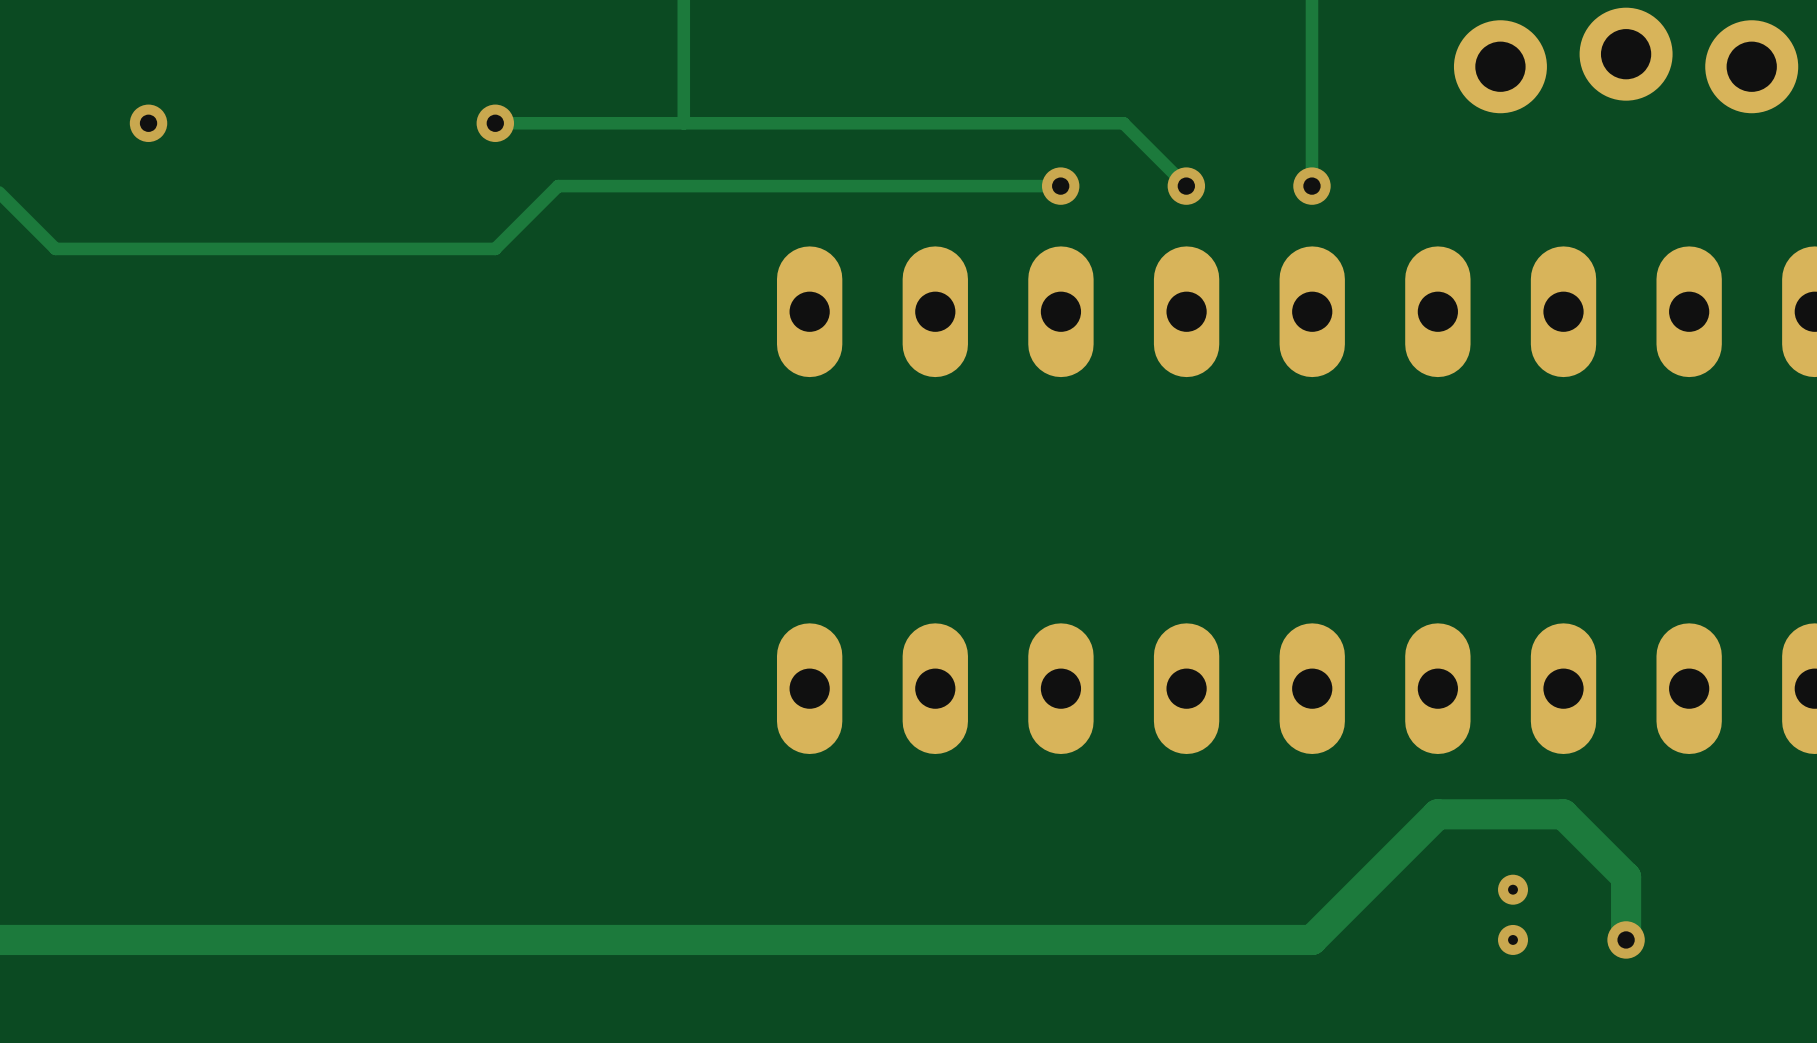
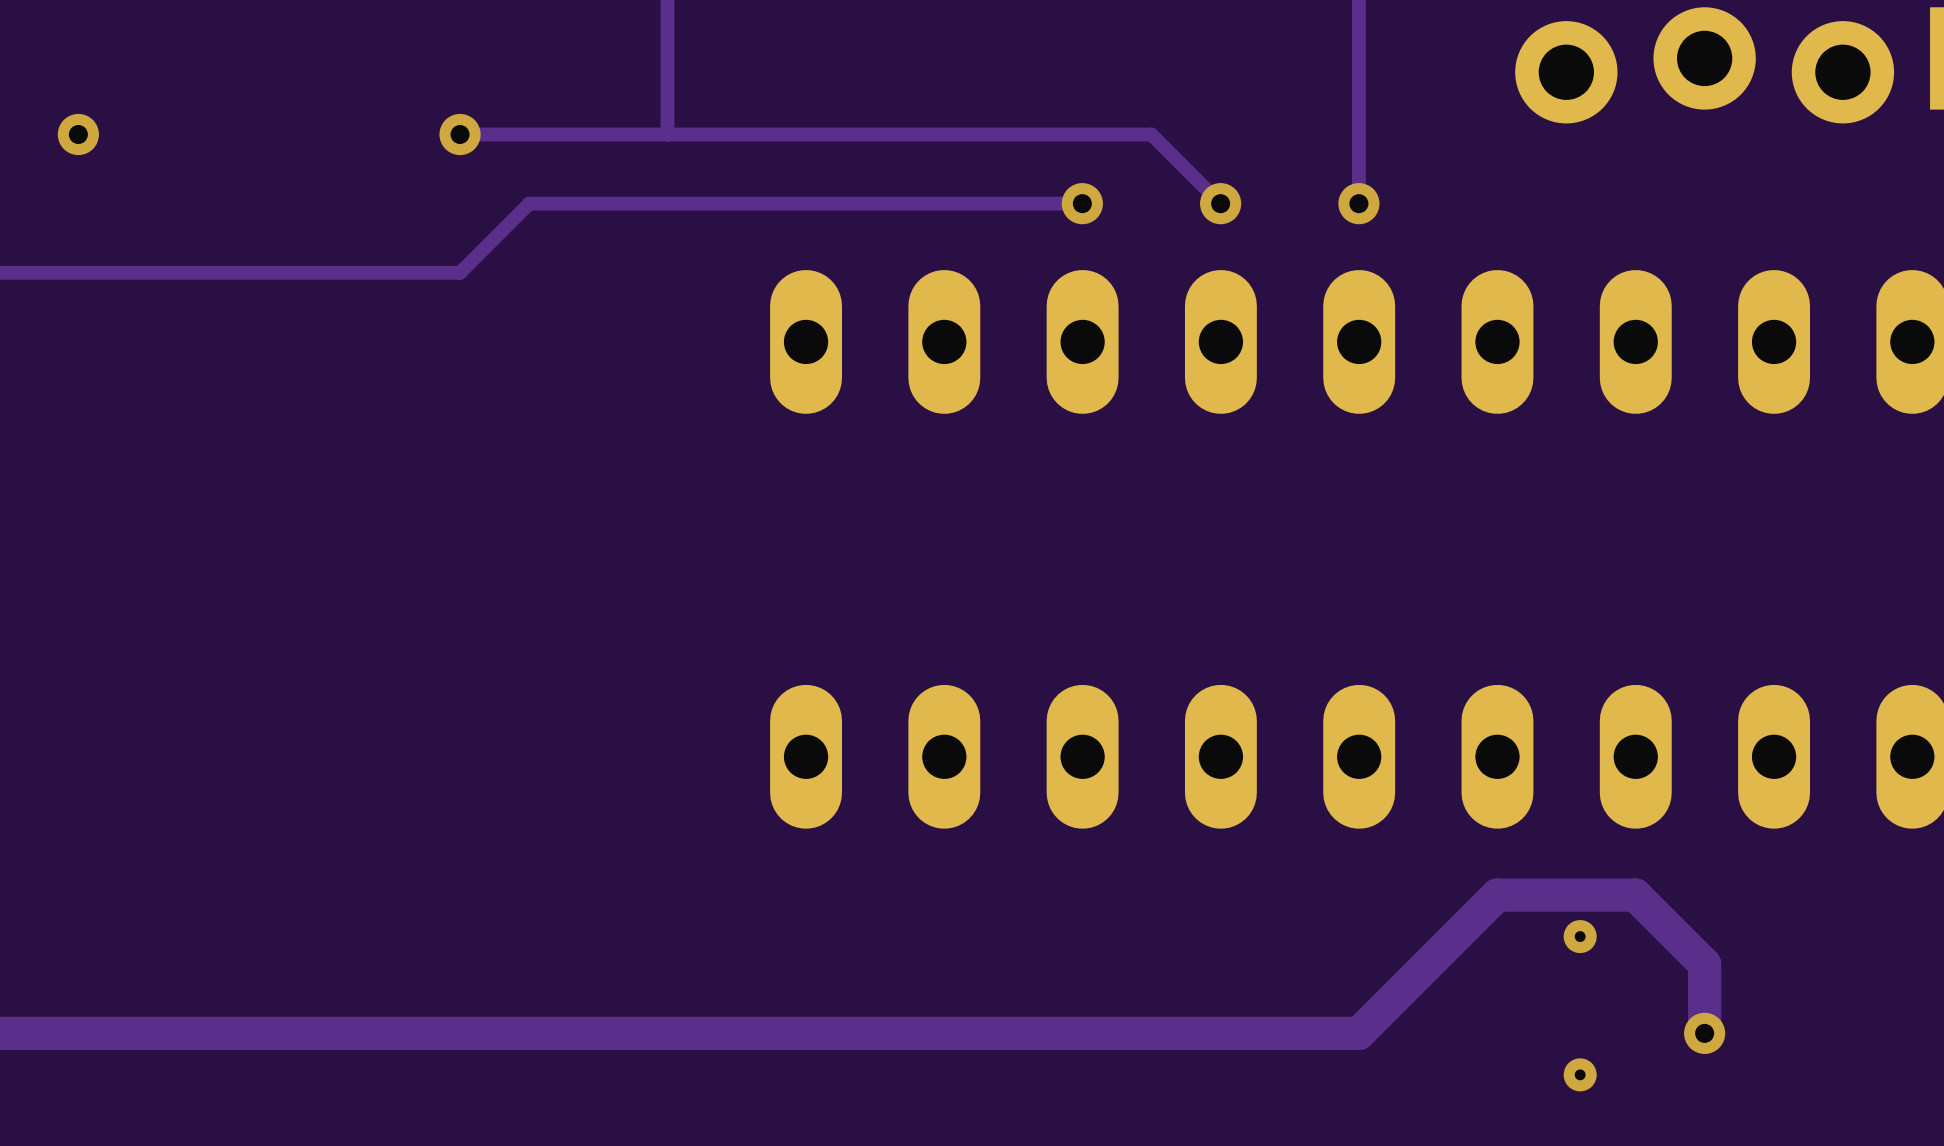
via position: (1513, 889) -> (1580, 936)
via position: (1513, 939) -> (1580, 1074)

